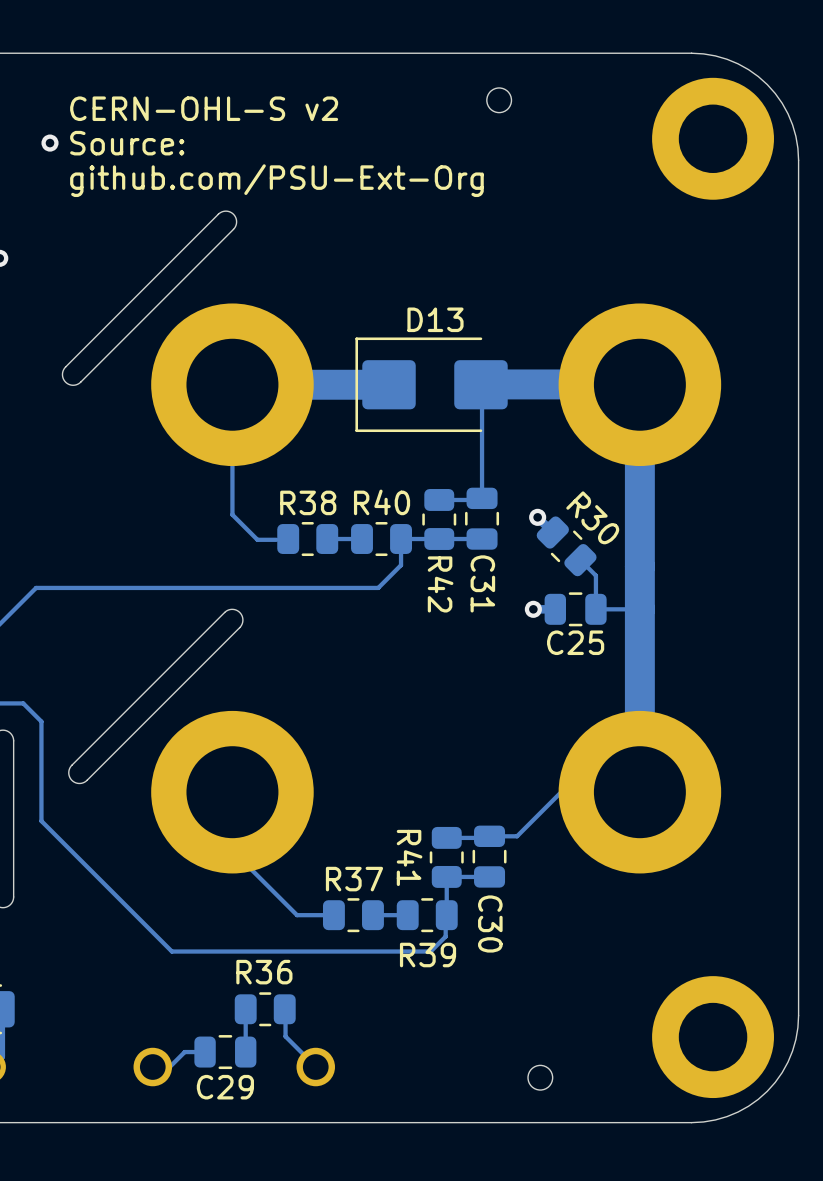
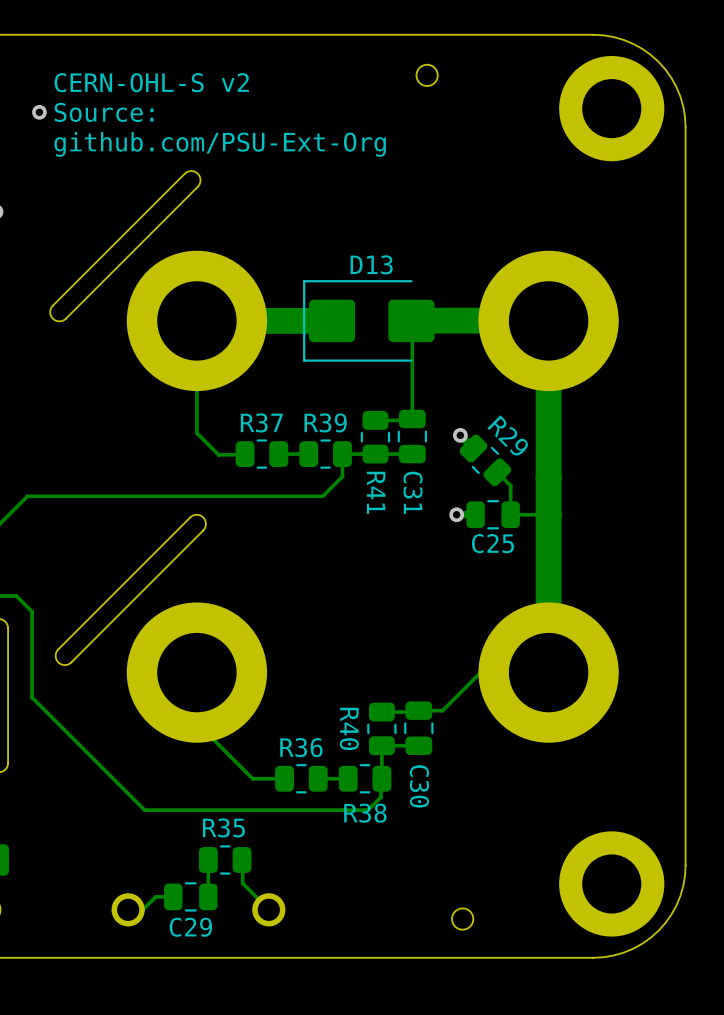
R38 name: R38 (308, 502) -> R37 (261, 422)
R40 name: R40 (382, 502) -> R39 (325, 422)
R30 name: R30 (592, 517) -> R29 (507, 435)
R42 name: R42 (440, 584) -> R41 (376, 492)
R41 name: R41 (409, 857) -> R40 (349, 728)
R37 name: R37 (354, 879) -> R36 (301, 747)
R39 name: R39 (428, 955) -> R38 (365, 813)
R36 name: R36 (264, 972) -> R35 (223, 827)

